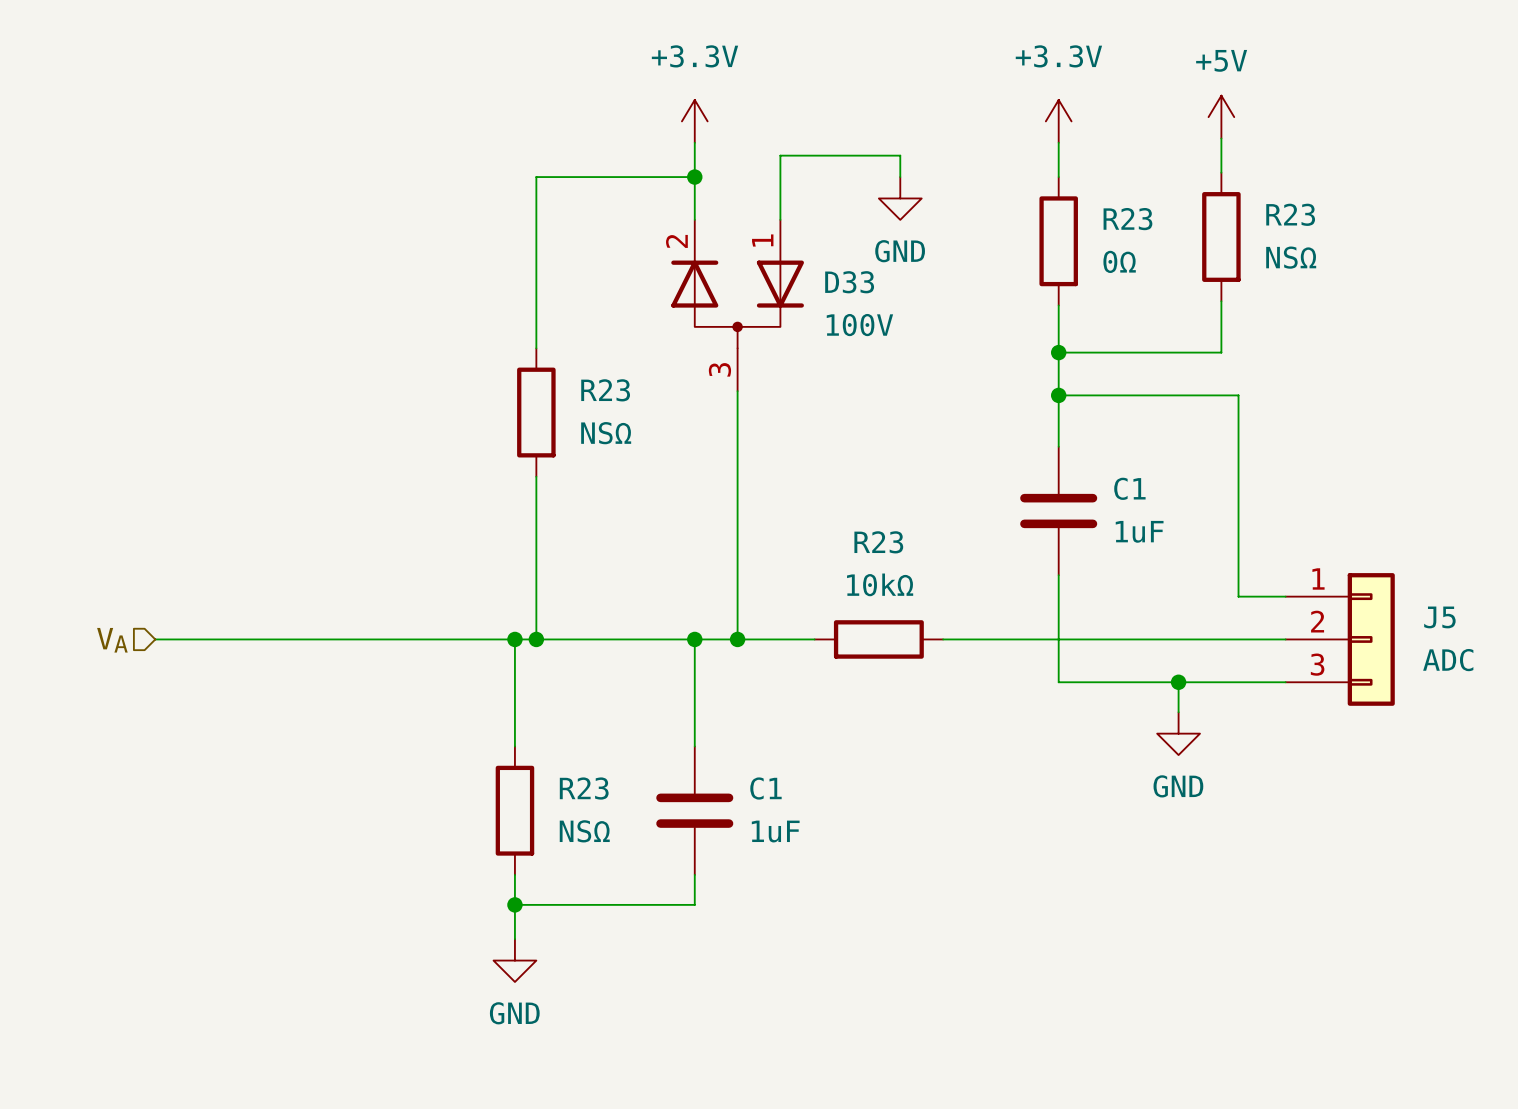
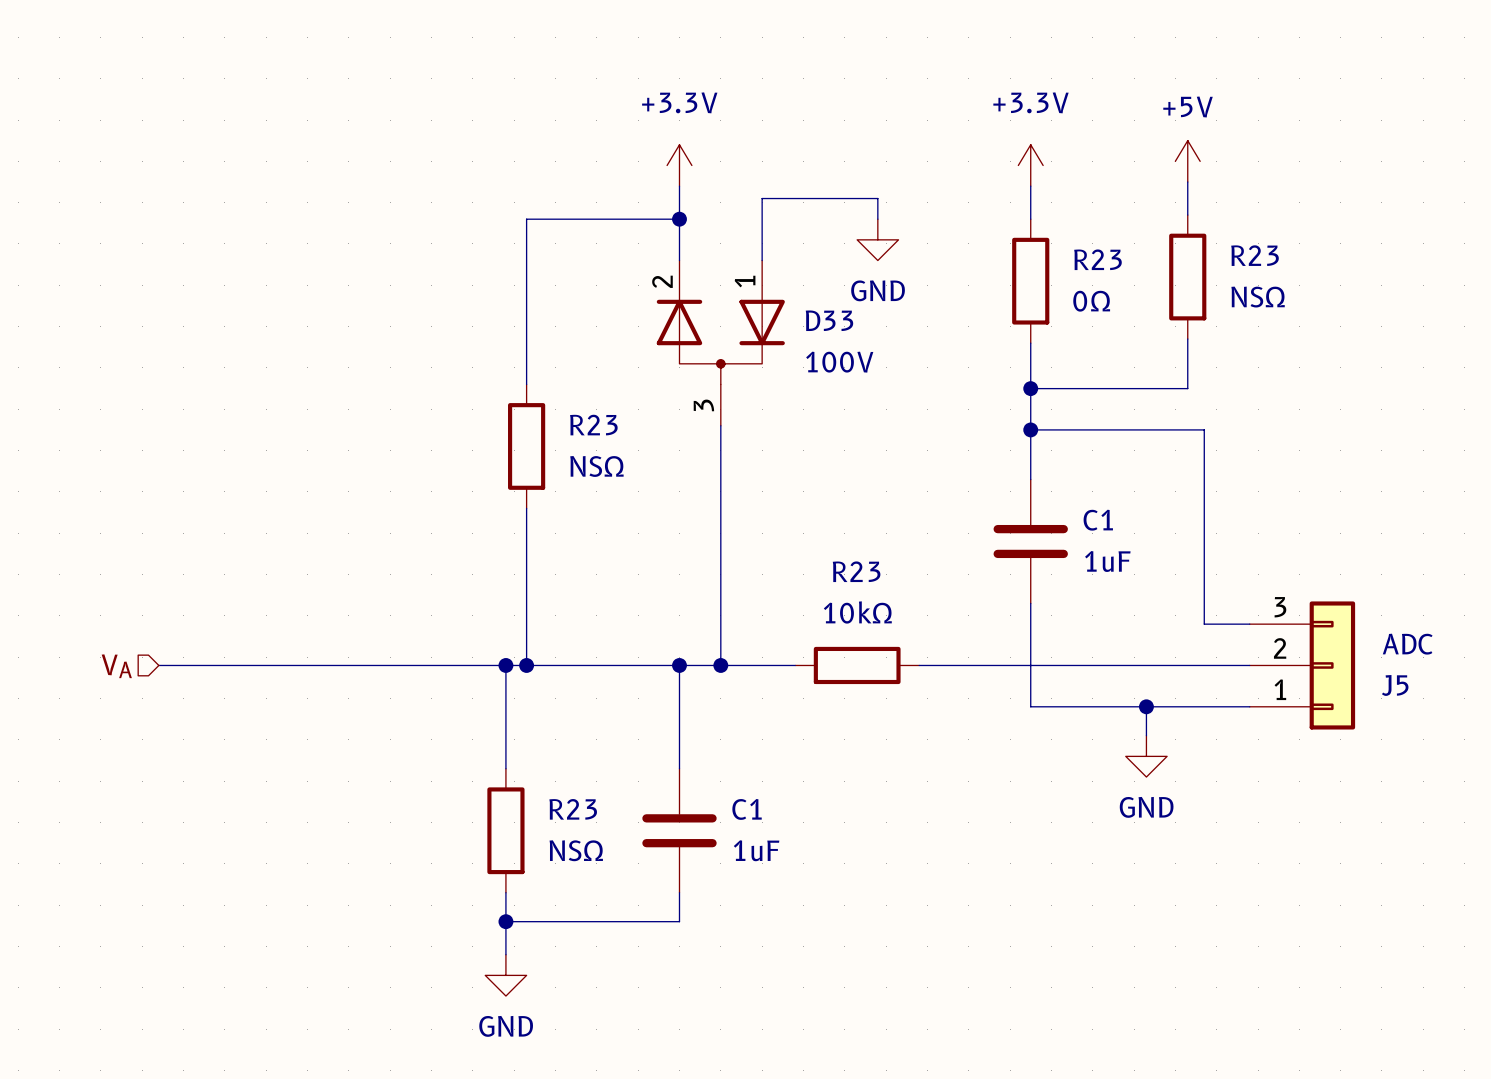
J5 flip: as is (1371, 639) -> up-down (1332, 665)

